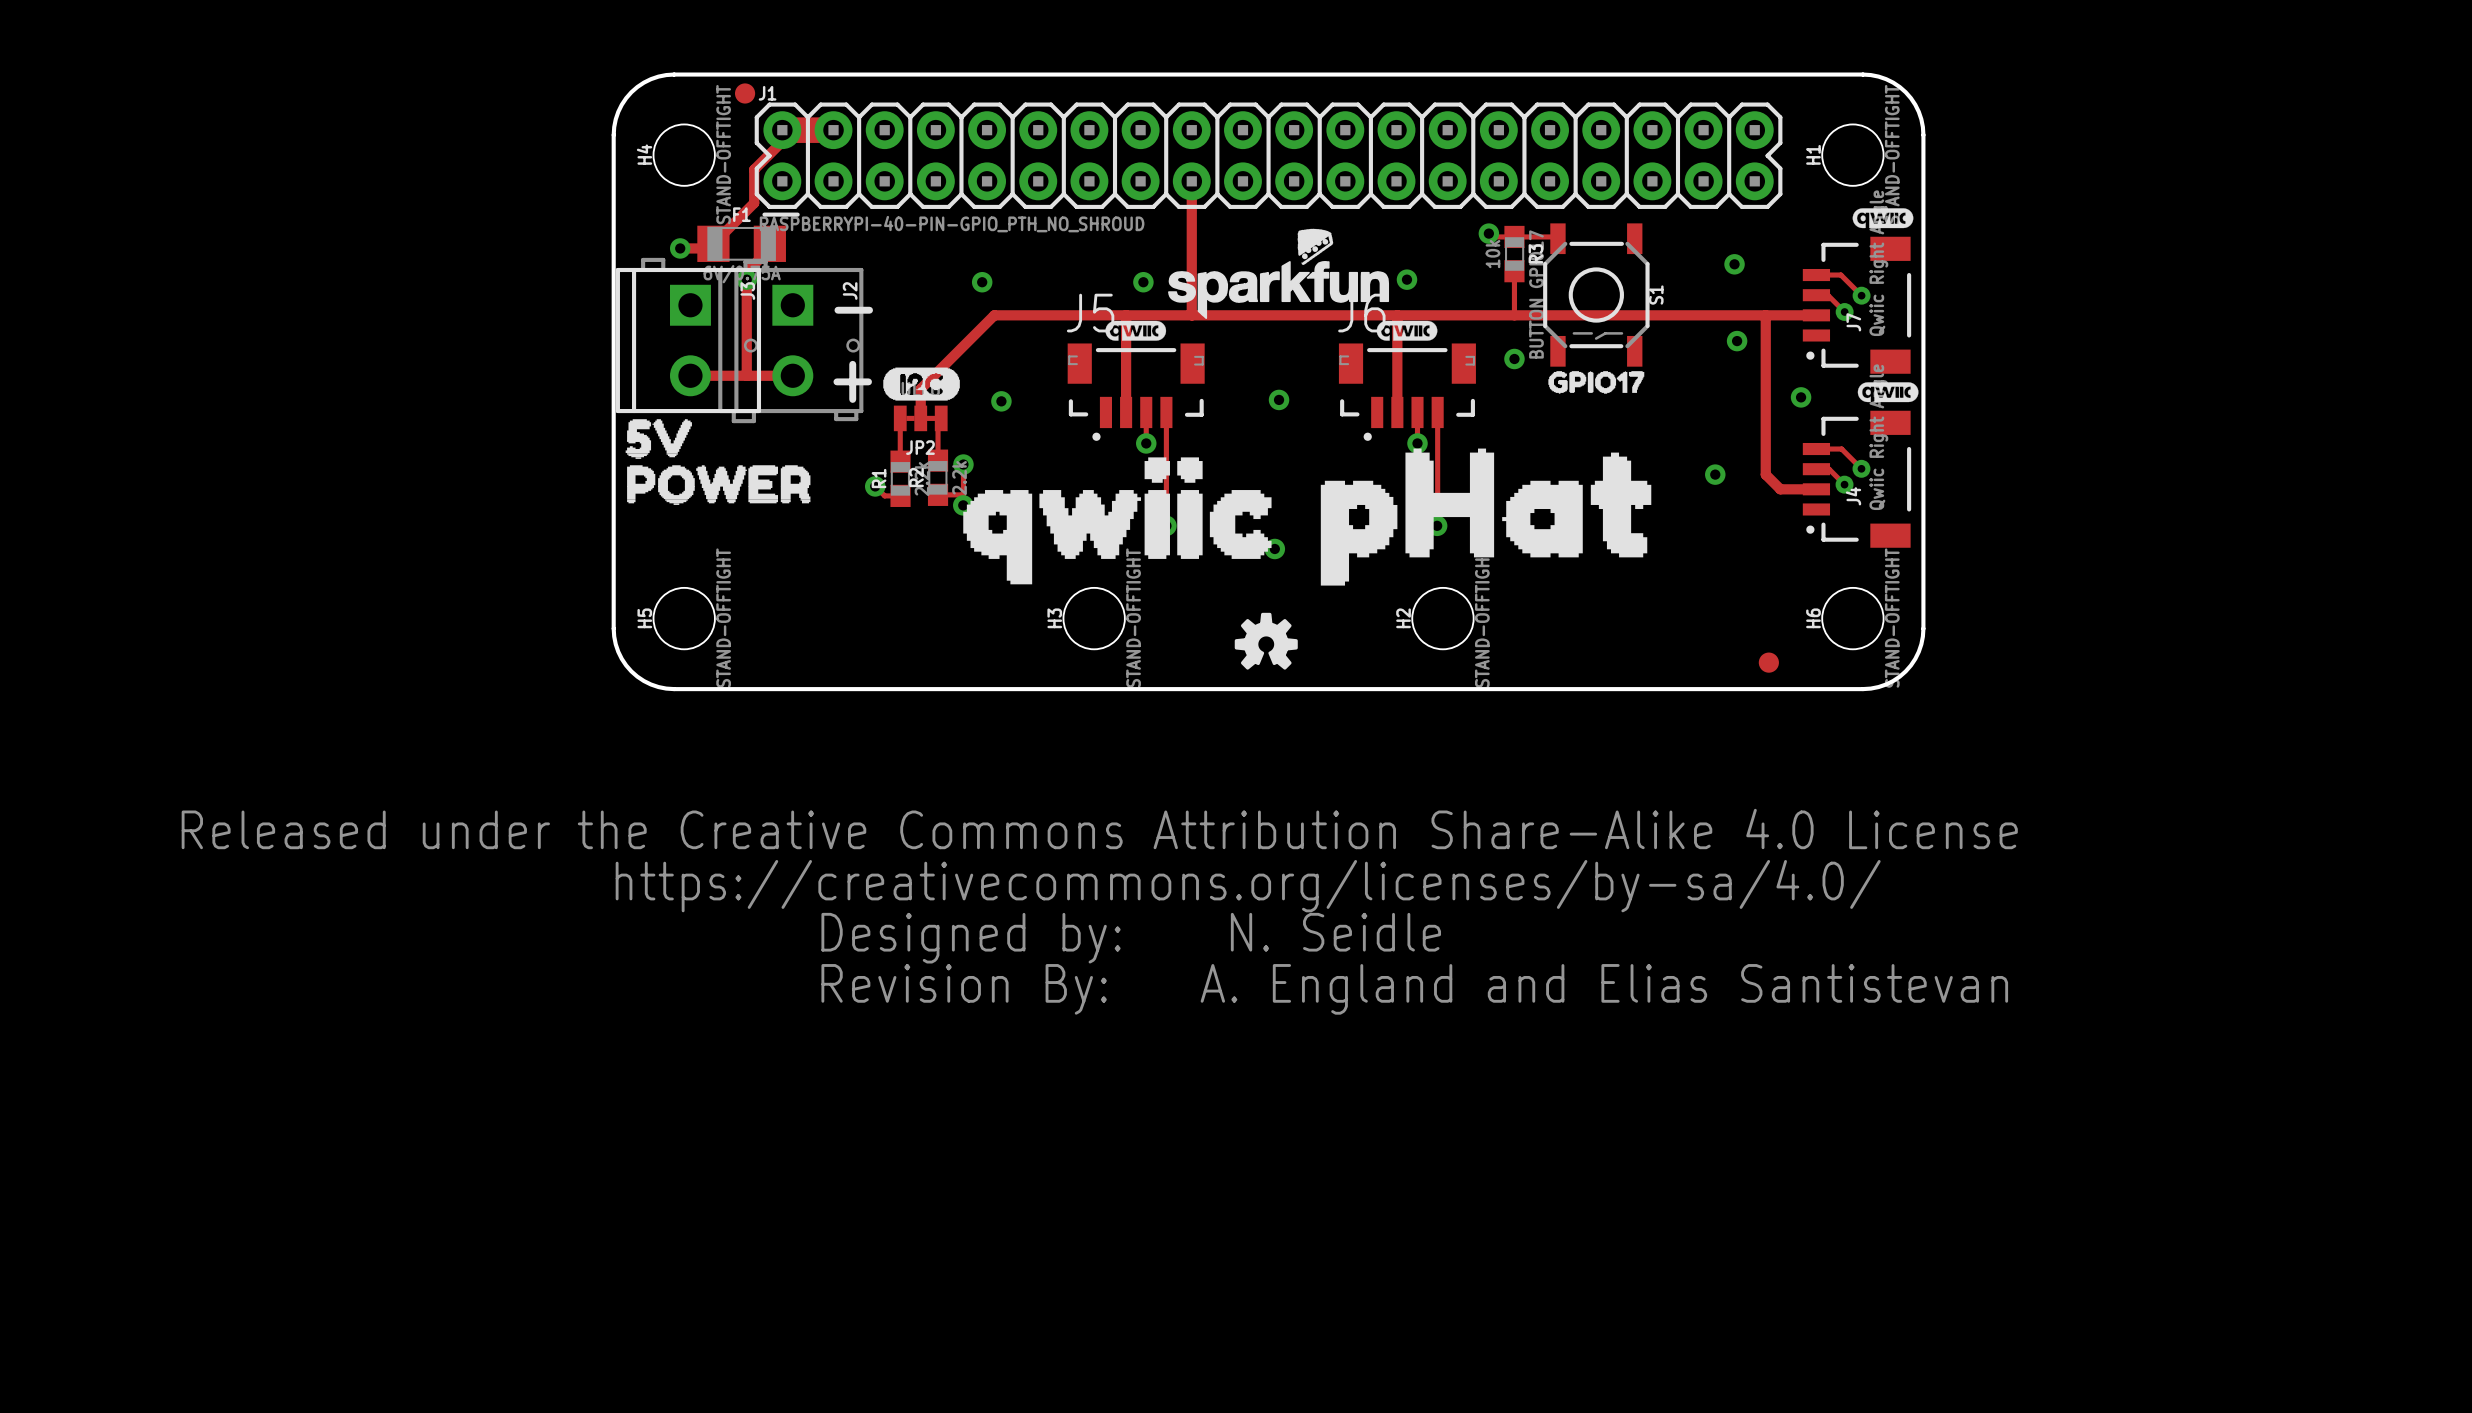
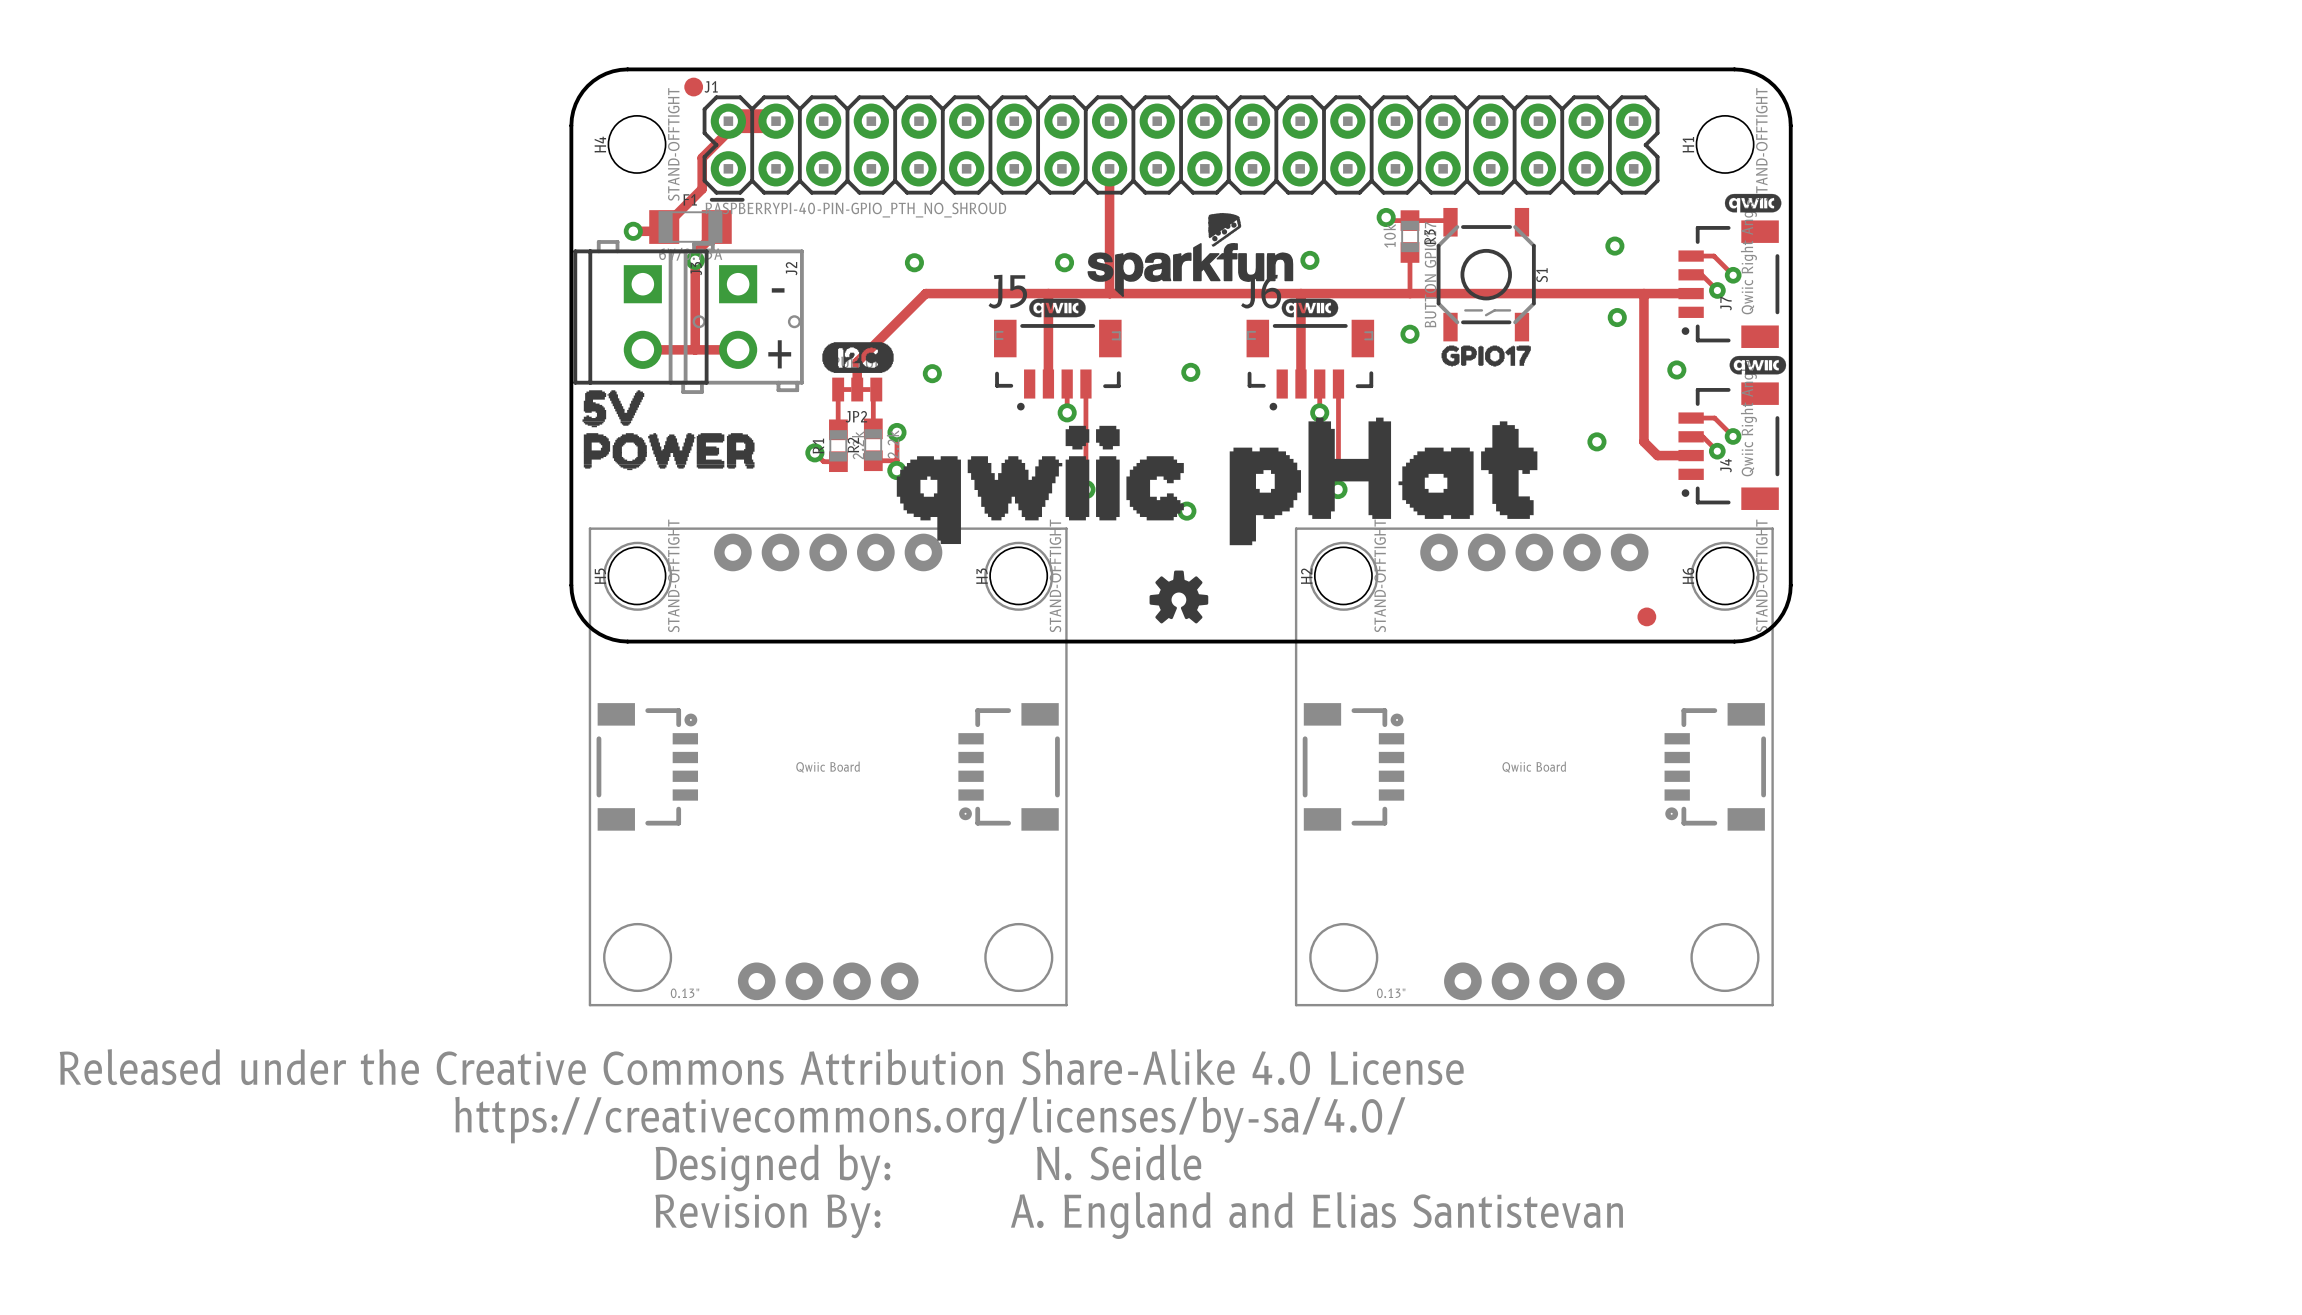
drawing: none -> [588, 527, 1068, 1007]
drawing: none -> [1294, 527, 1774, 1007]
drawing position: (1099, 886) -> (761, 1120)
text position: N. Seidle (1335, 932) -> N. Seidle (1119, 1162)
drawing position: (964, 989) -> (767, 1216)
text position: A. England and Elias Santistevan (1604, 989) -> A. England and Elias Santistevan (1316, 1215)

